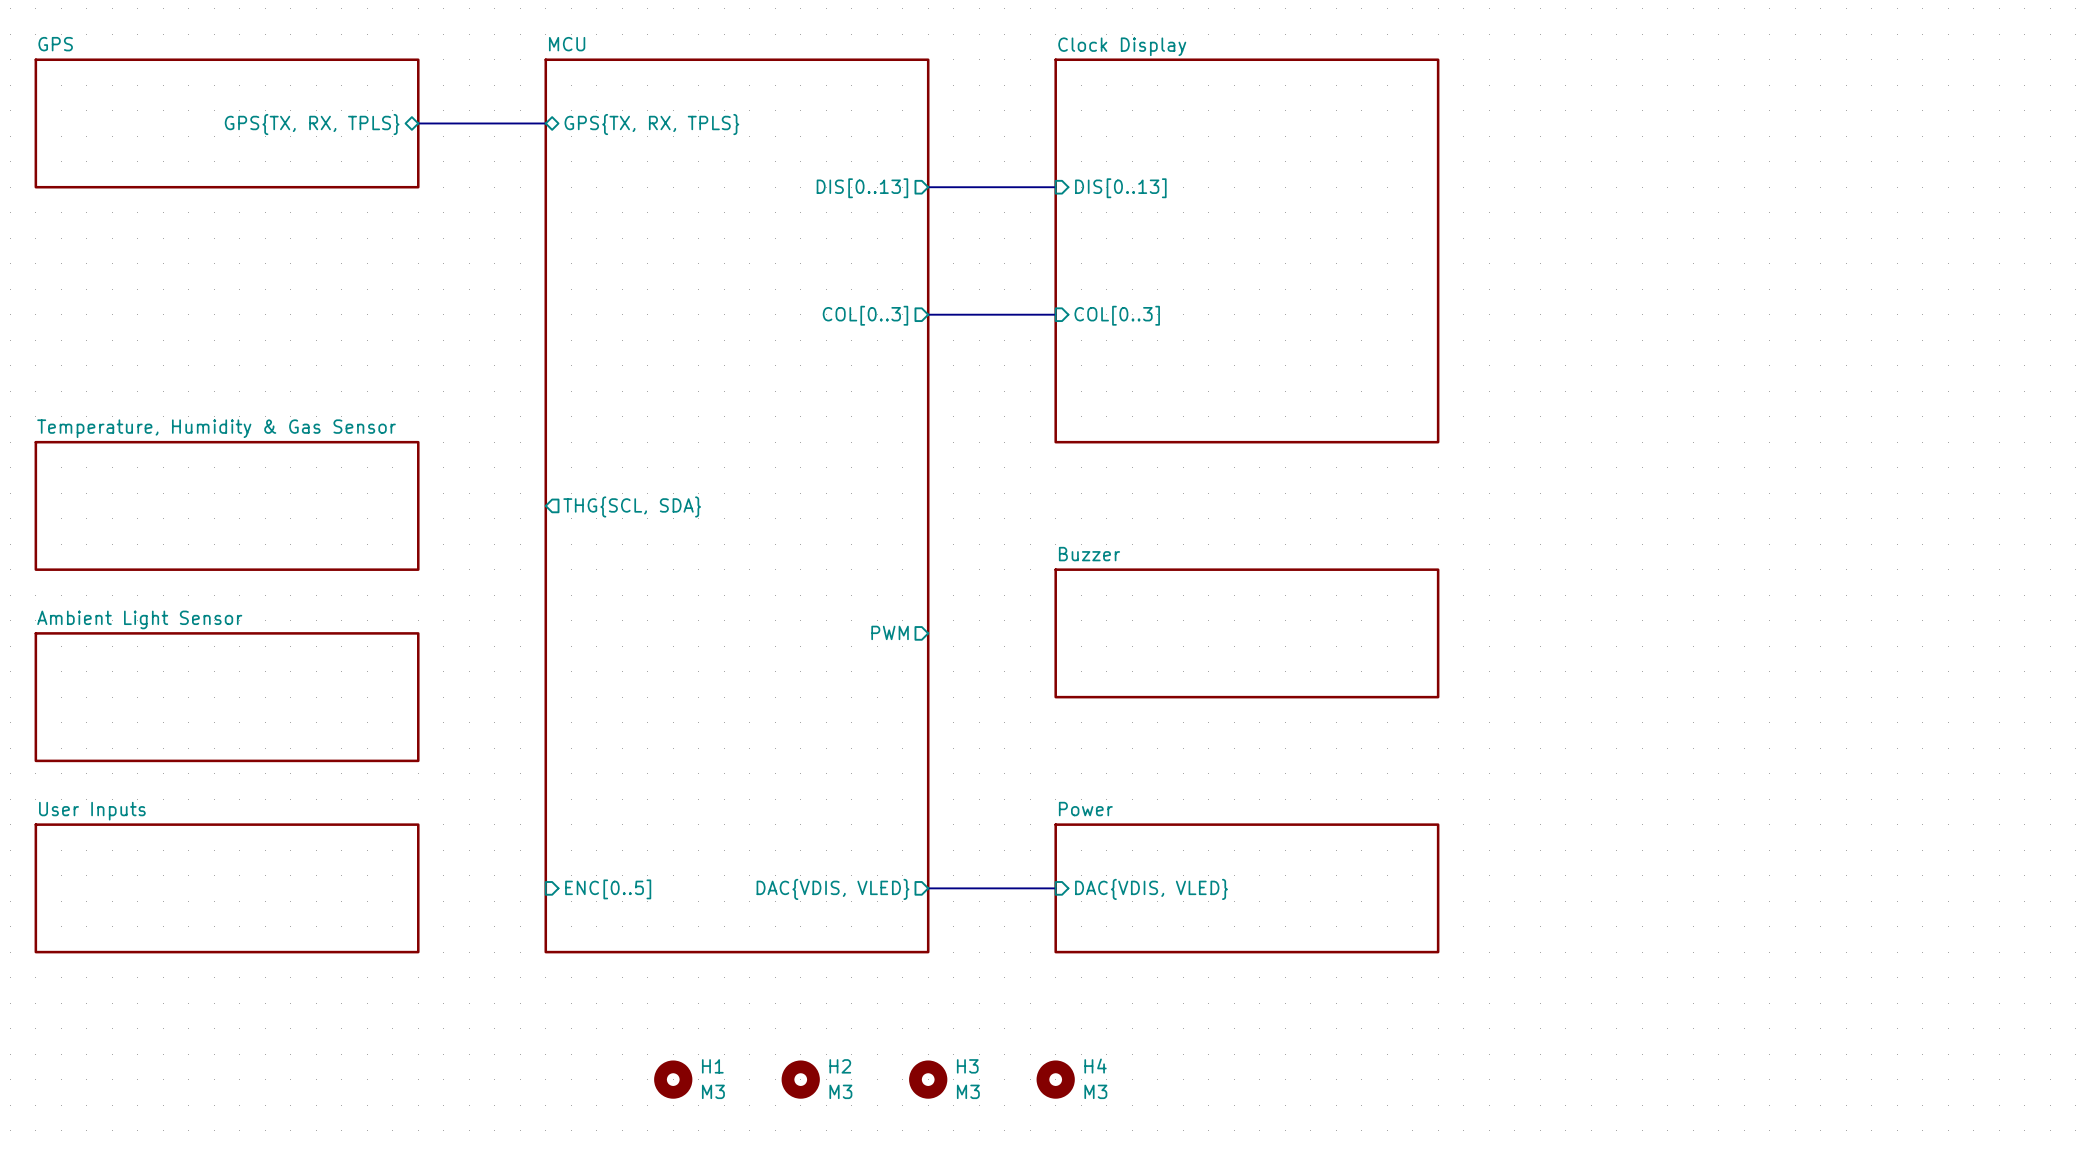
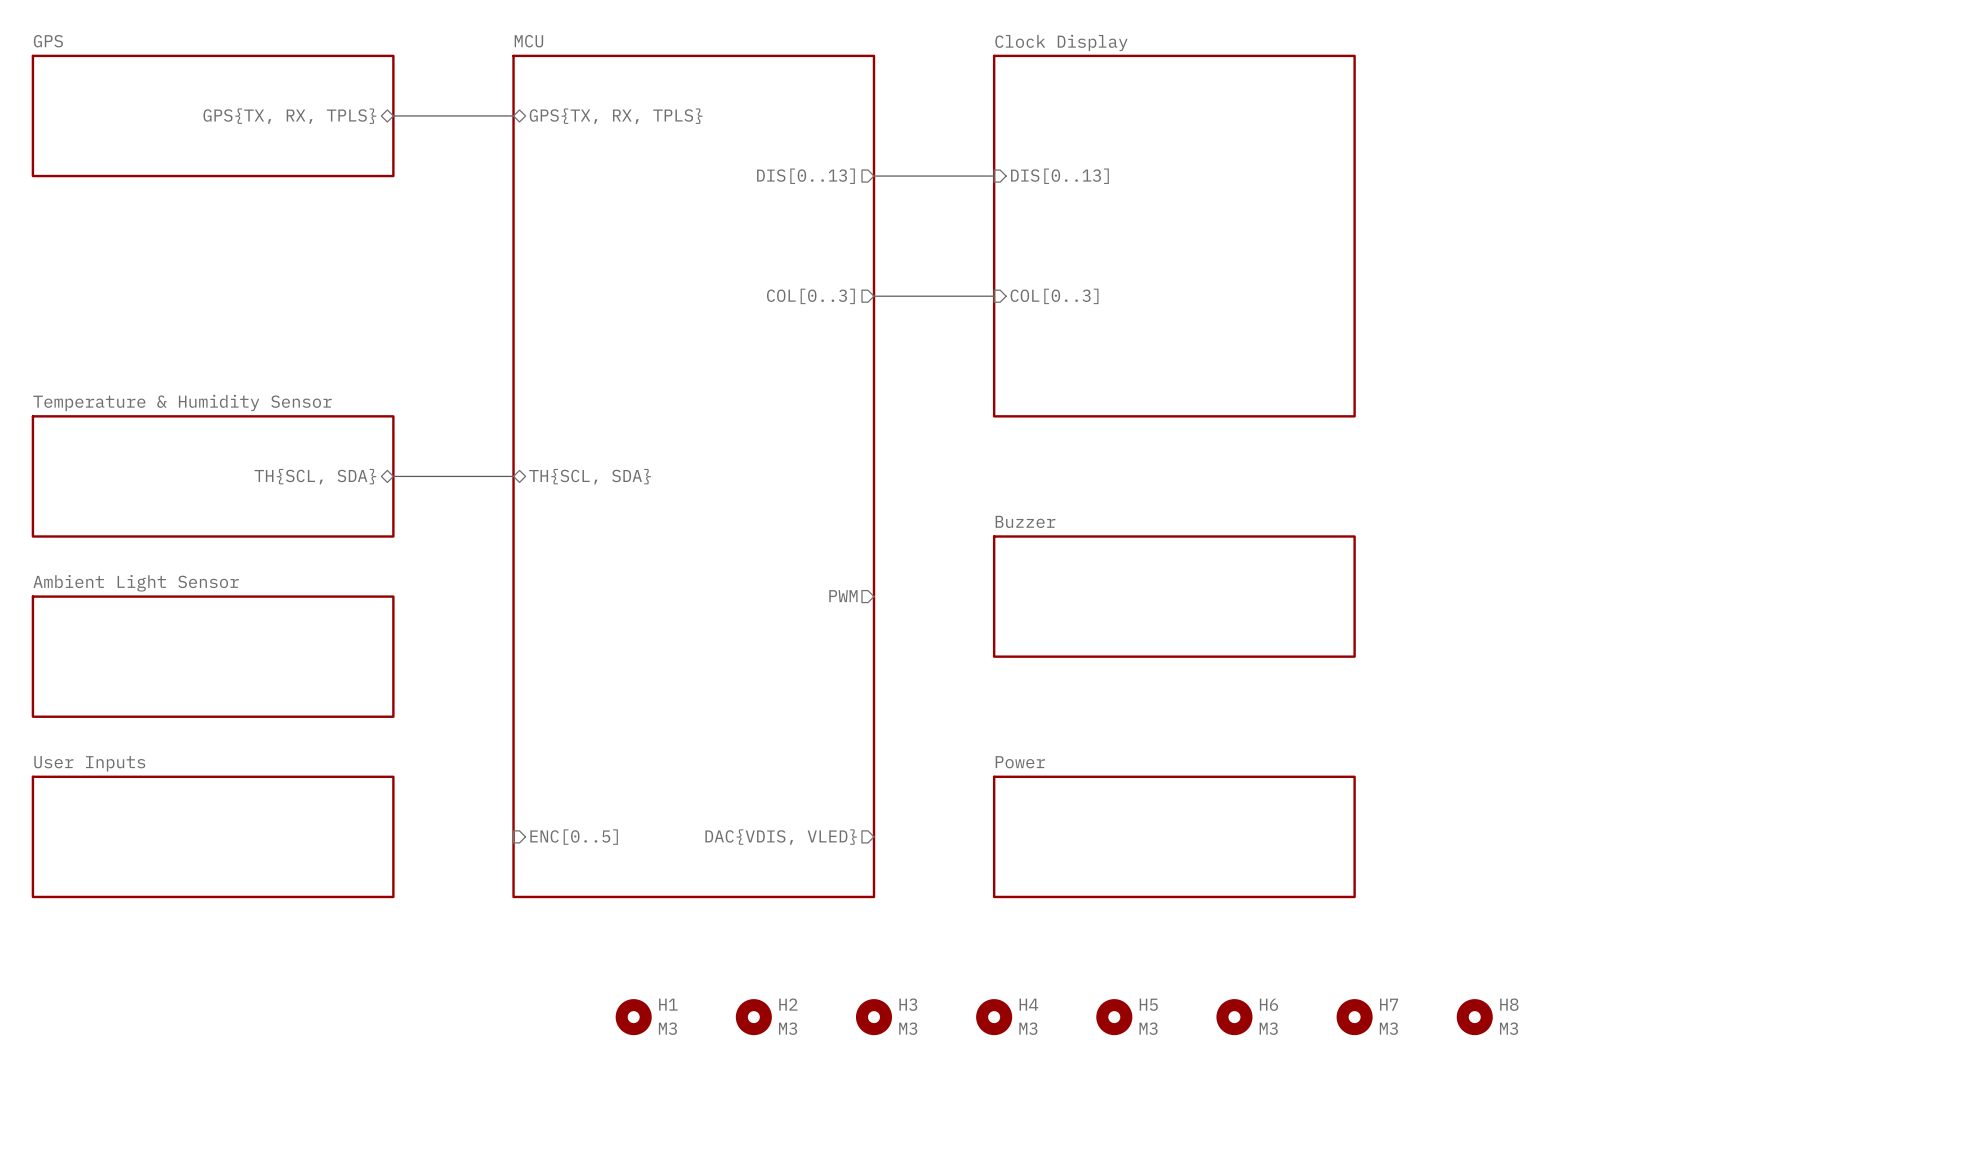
sheet Temperature & Humidity Sensor name: Temperature, Humidity & Gas Sensor (216, 428) -> Temperature & Humidity Sensor (182, 402)
bus: none -> (393, 476) (513, 476)
sheet pin: none -> TH{SCL, SDA} (315, 476)
sheet pin shape: output (632, 506) -> bidirectional (590, 476)
sheet pin: THG{SCL, SDA} (632, 506) -> TH{SCL, SDA} (590, 476)
bus: (928, 888) (1055, 888) -> none
sheet pin: DAC{VDIS, VLED} (1151, 889) -> none
H5: none -> M3 (1114, 1017)
H6: none -> M3 (1234, 1017)
H7: none -> M3 (1354, 1017)
H8: none -> M3 (1474, 1017)

